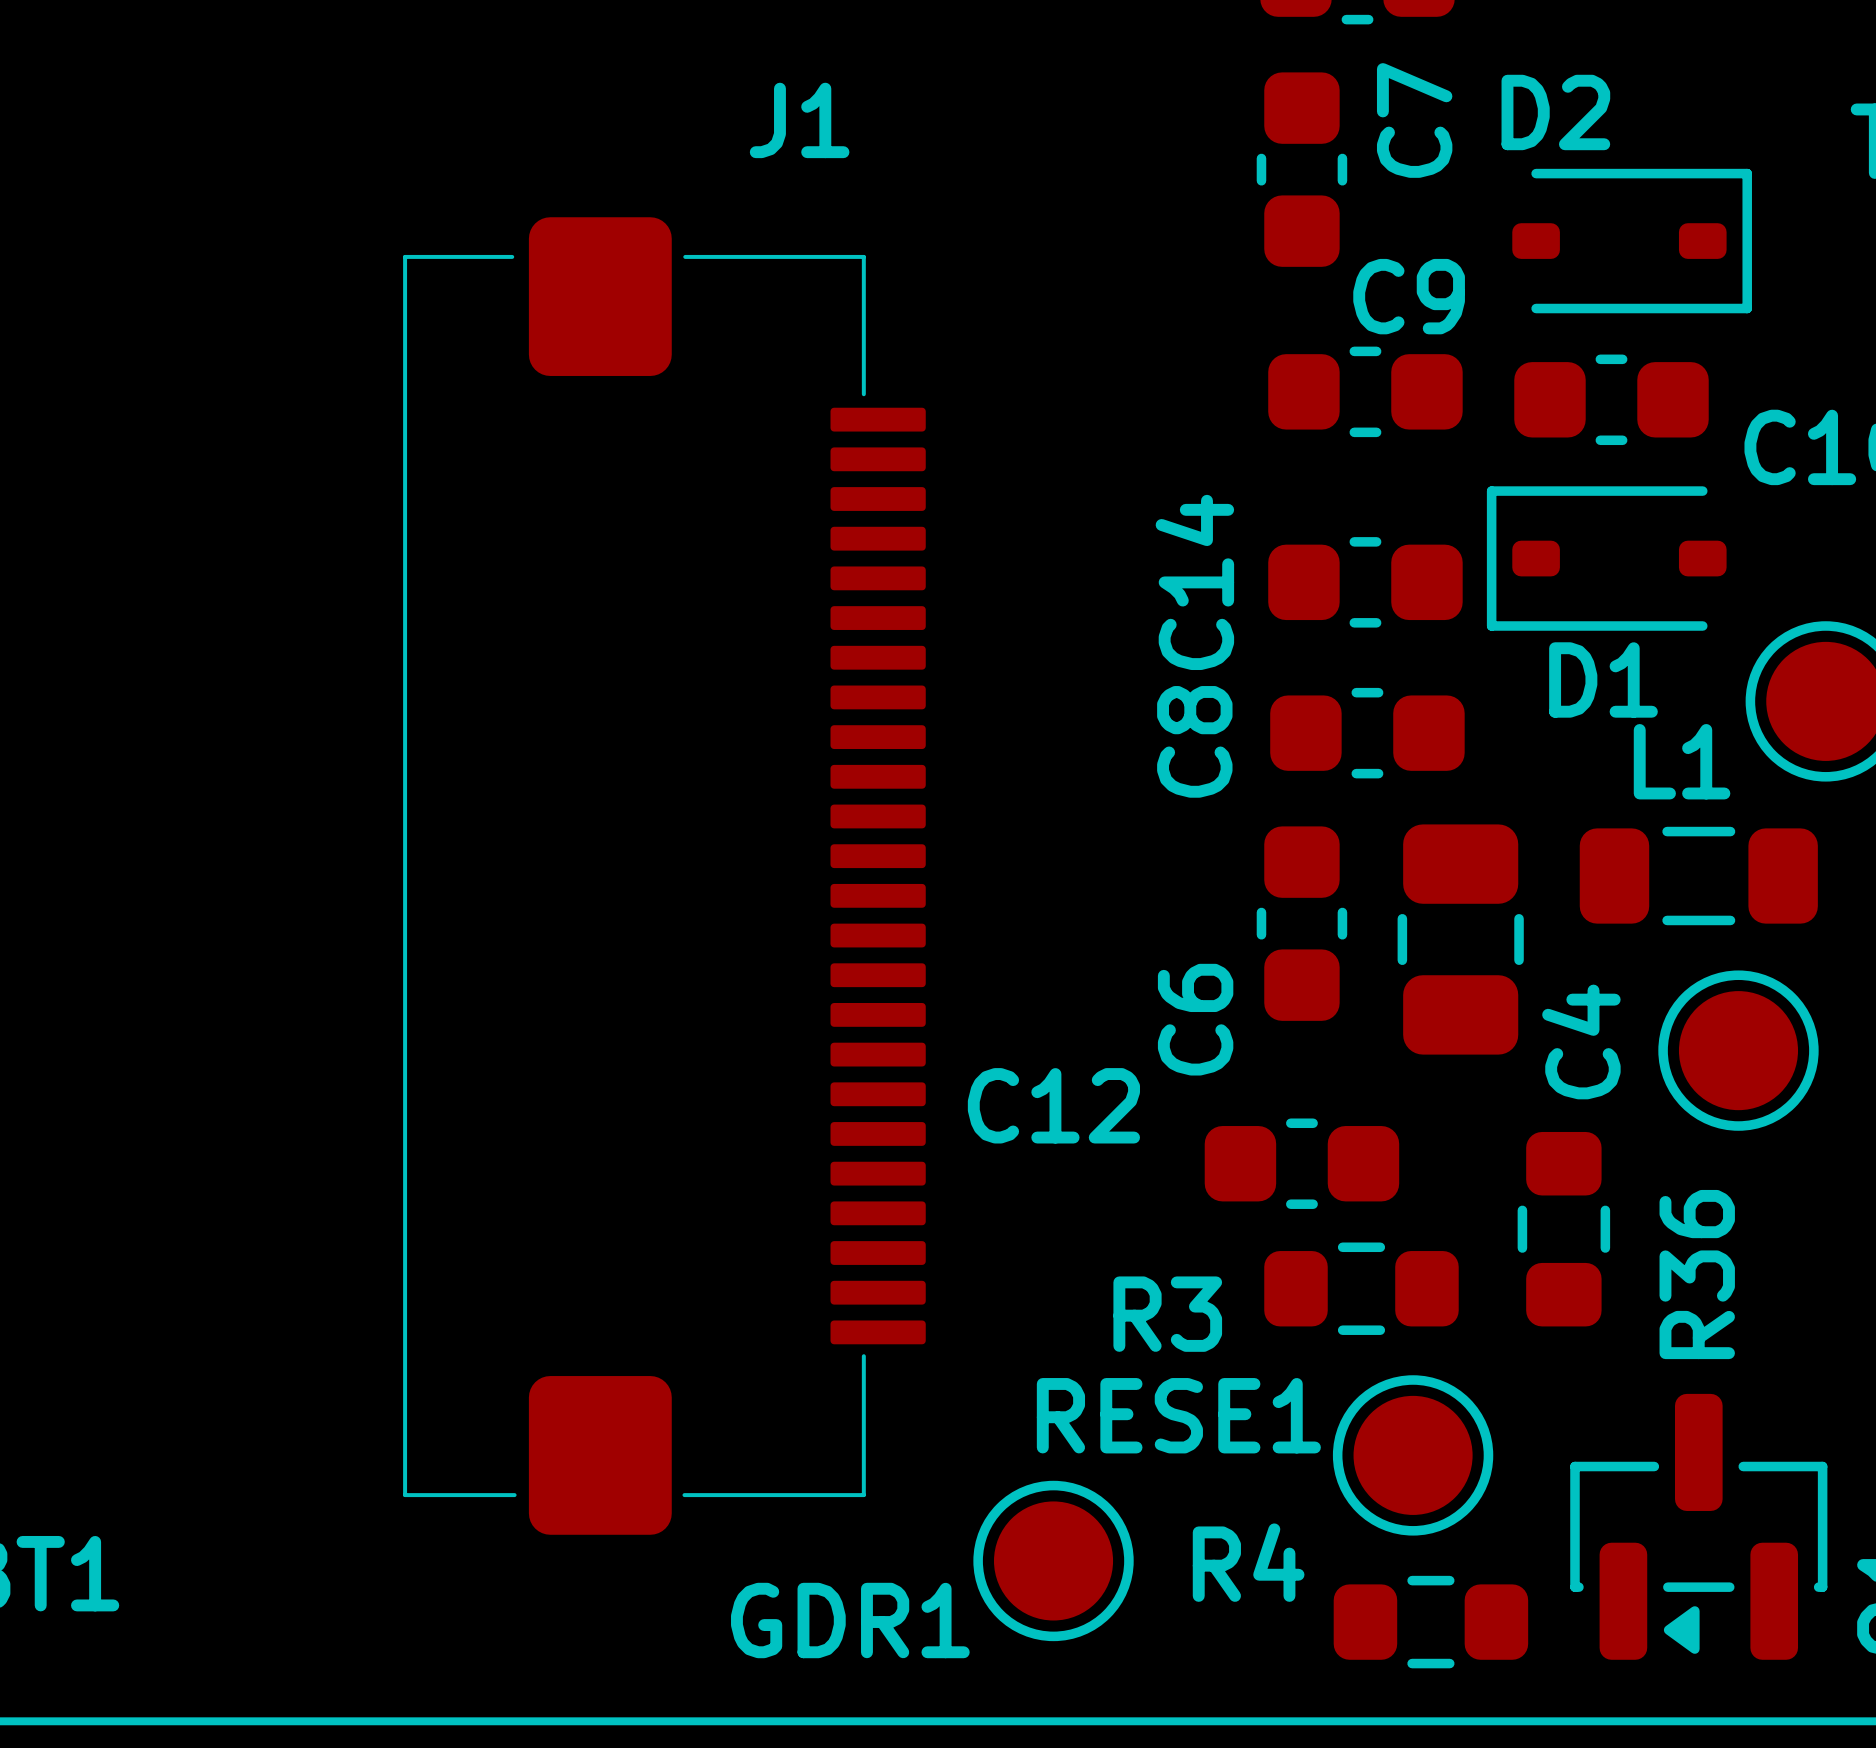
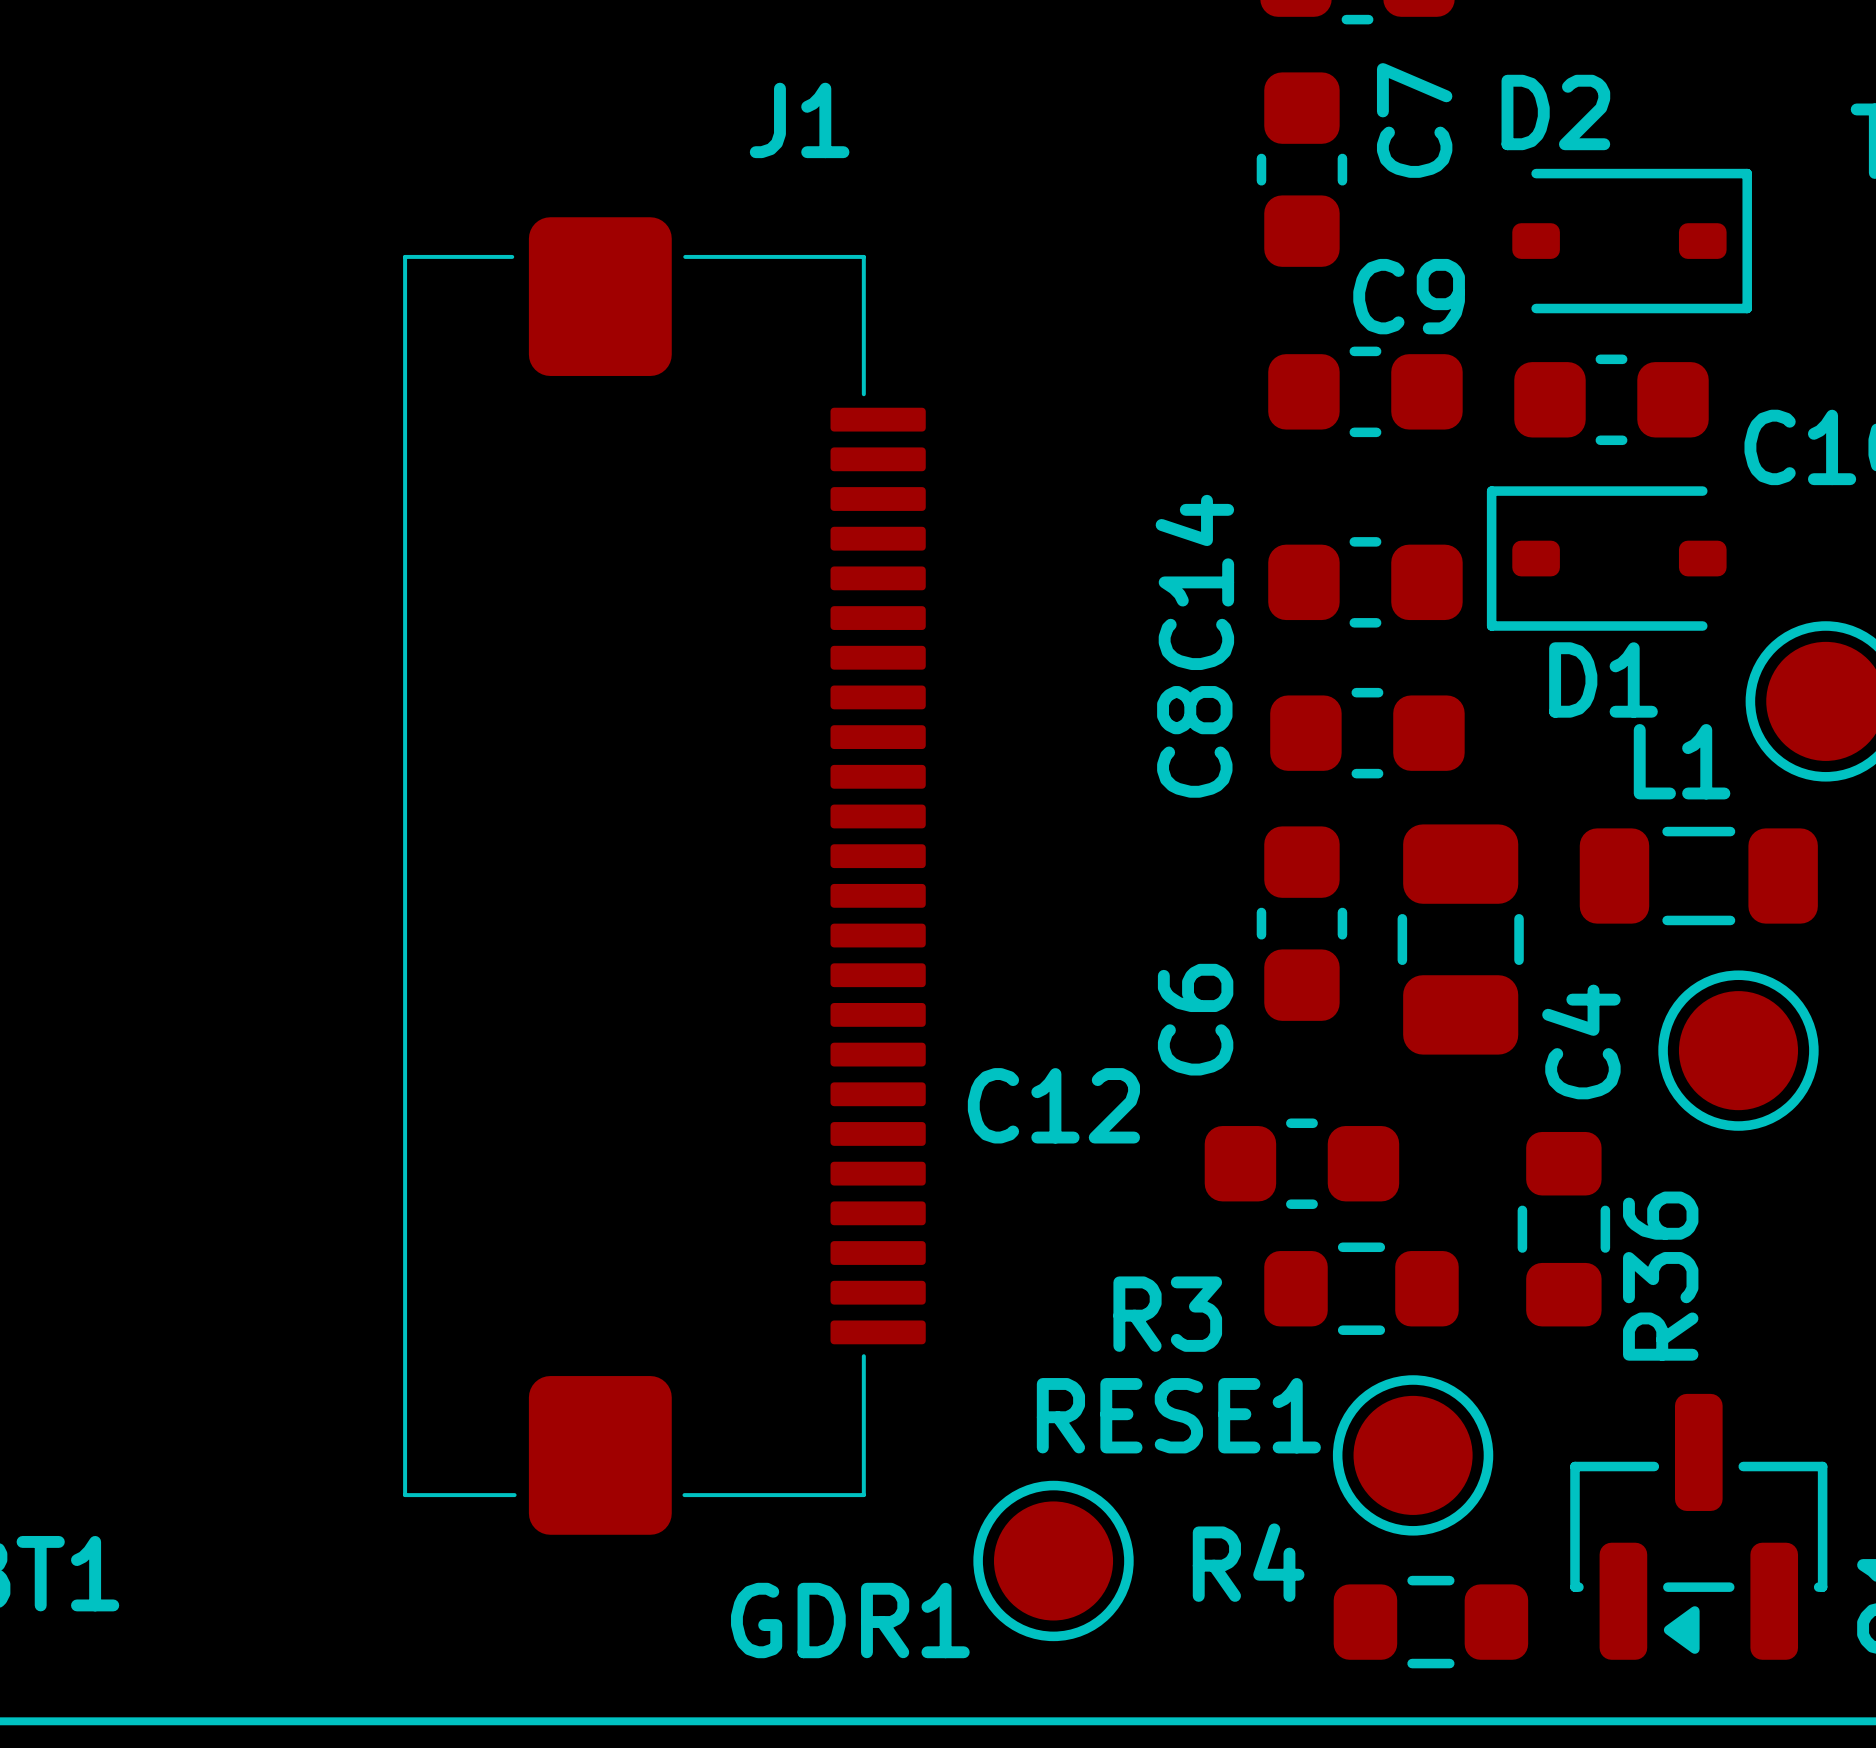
R36 name position: R36 (1697, 1274) -> R36 (1660, 1276)

